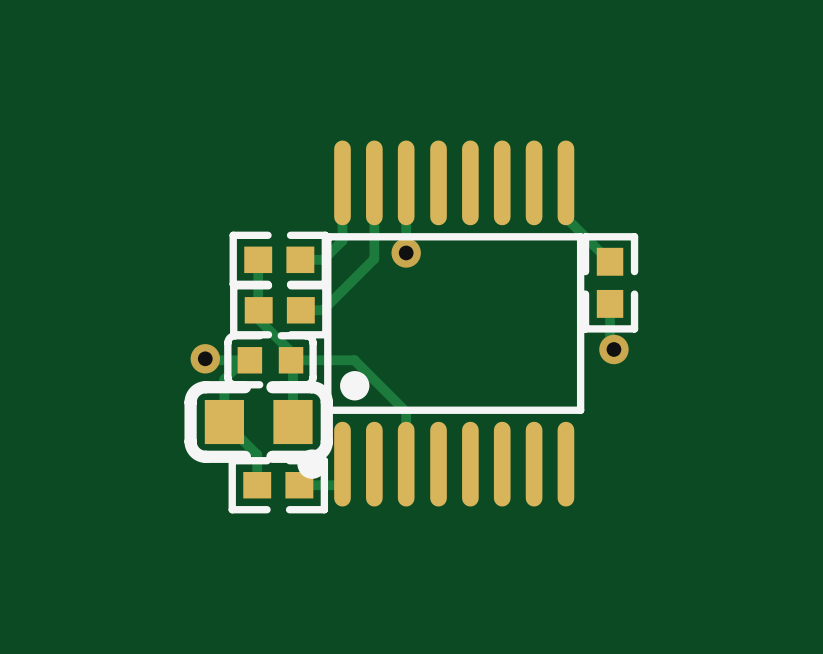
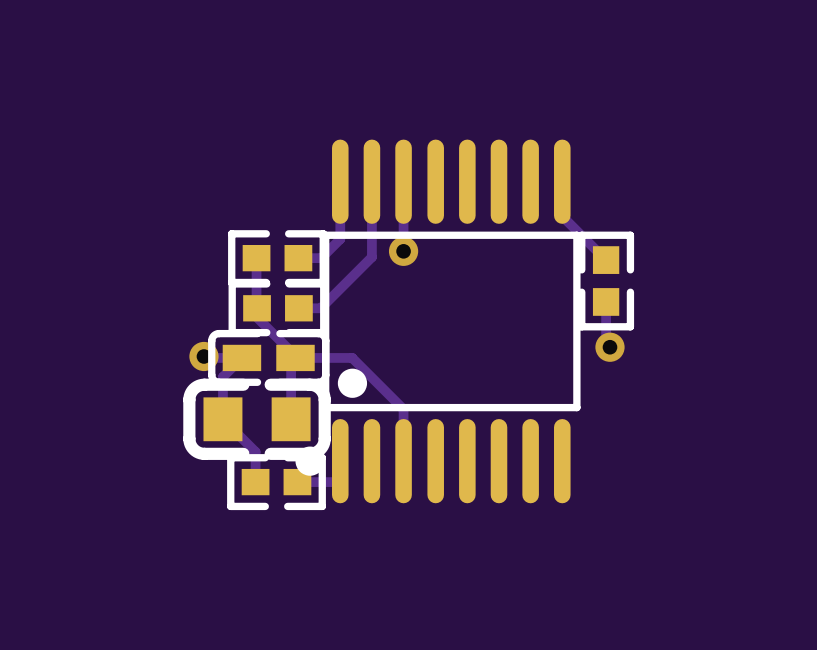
part footprint: [224, 332, 317, 389] -> [208, 329, 330, 386]

